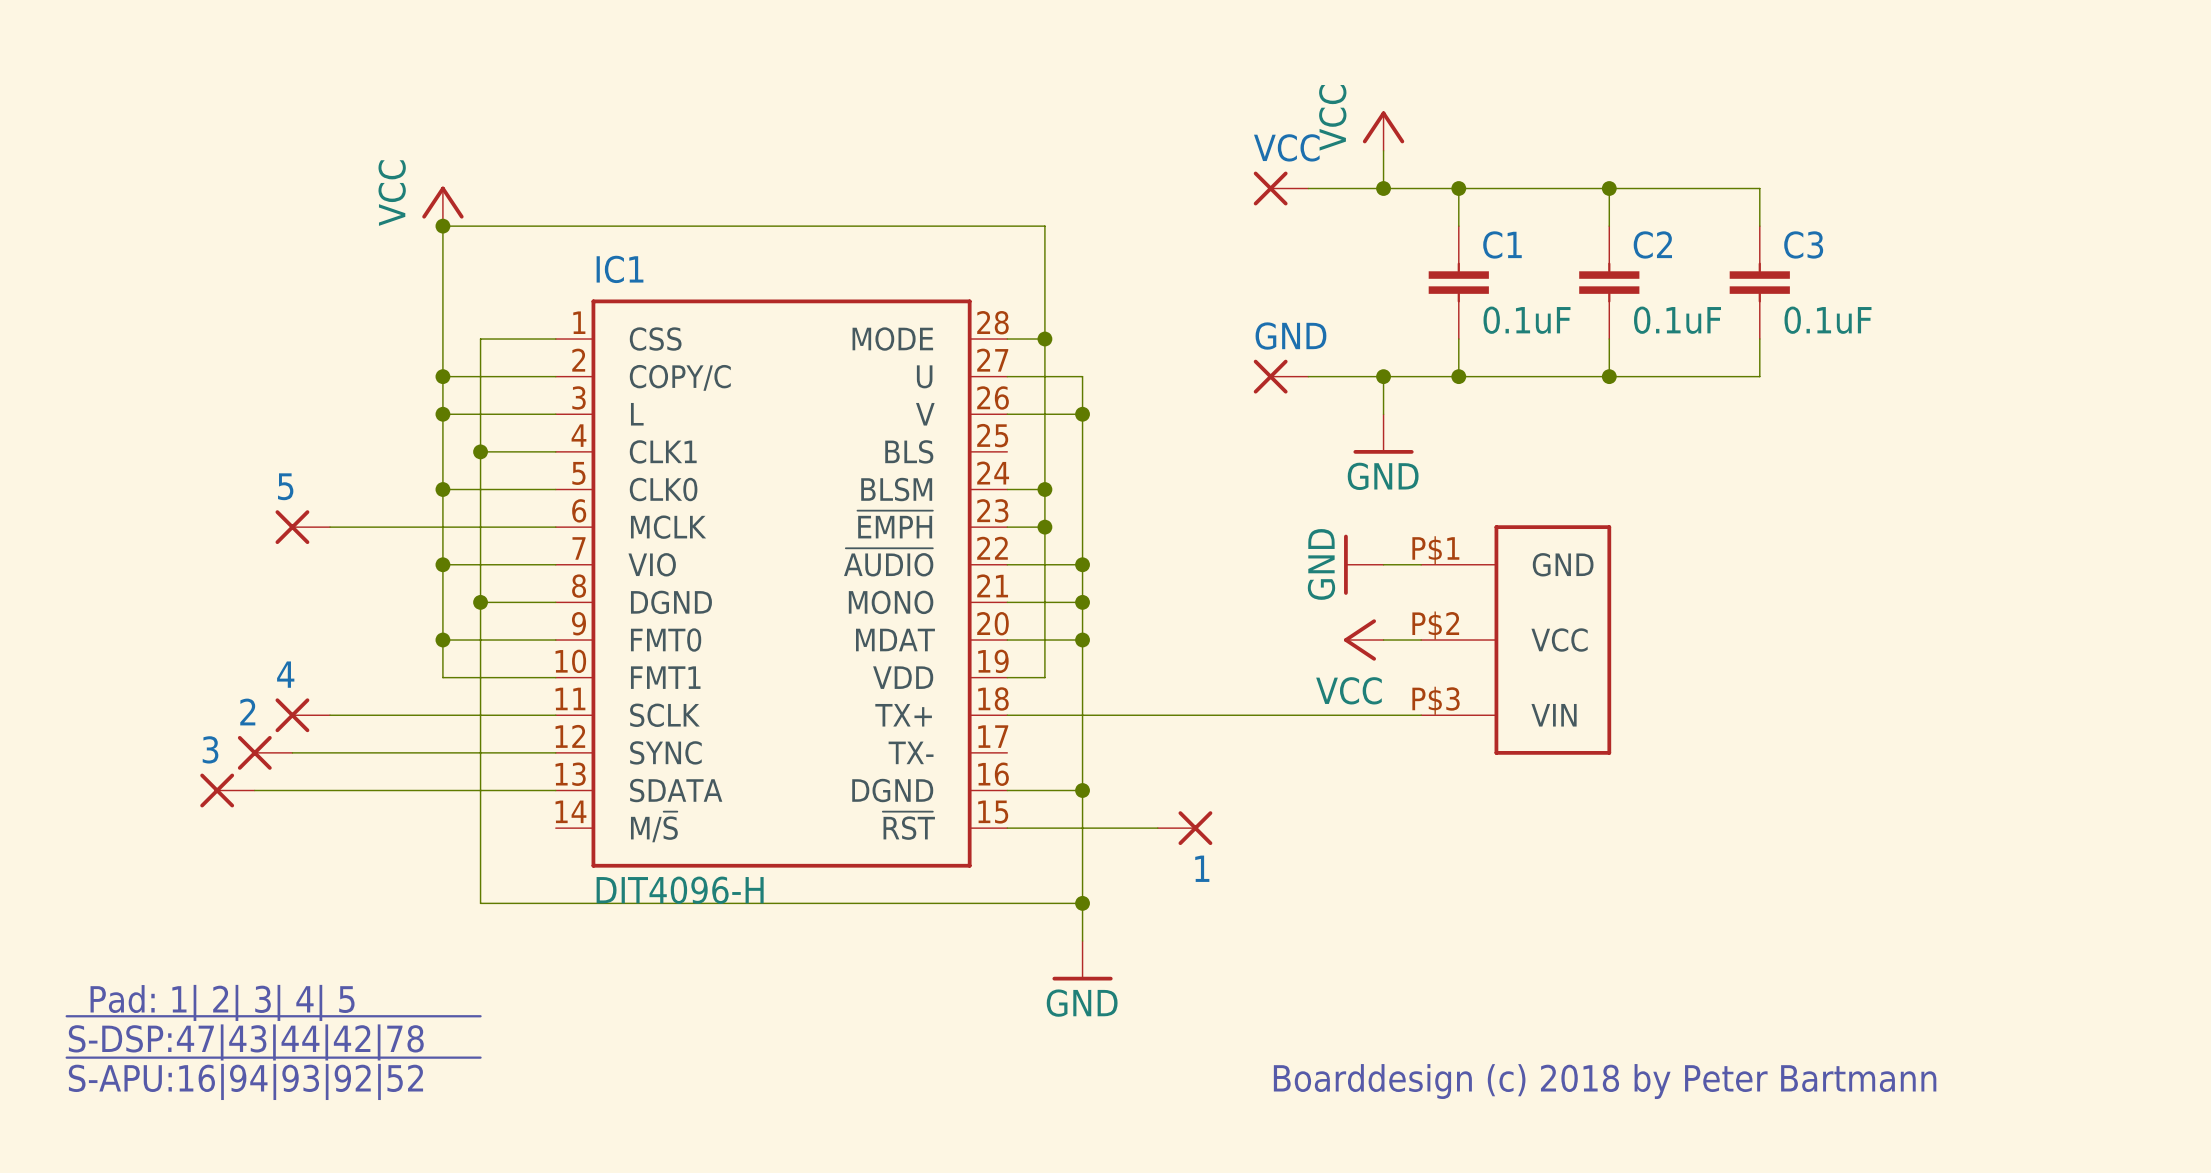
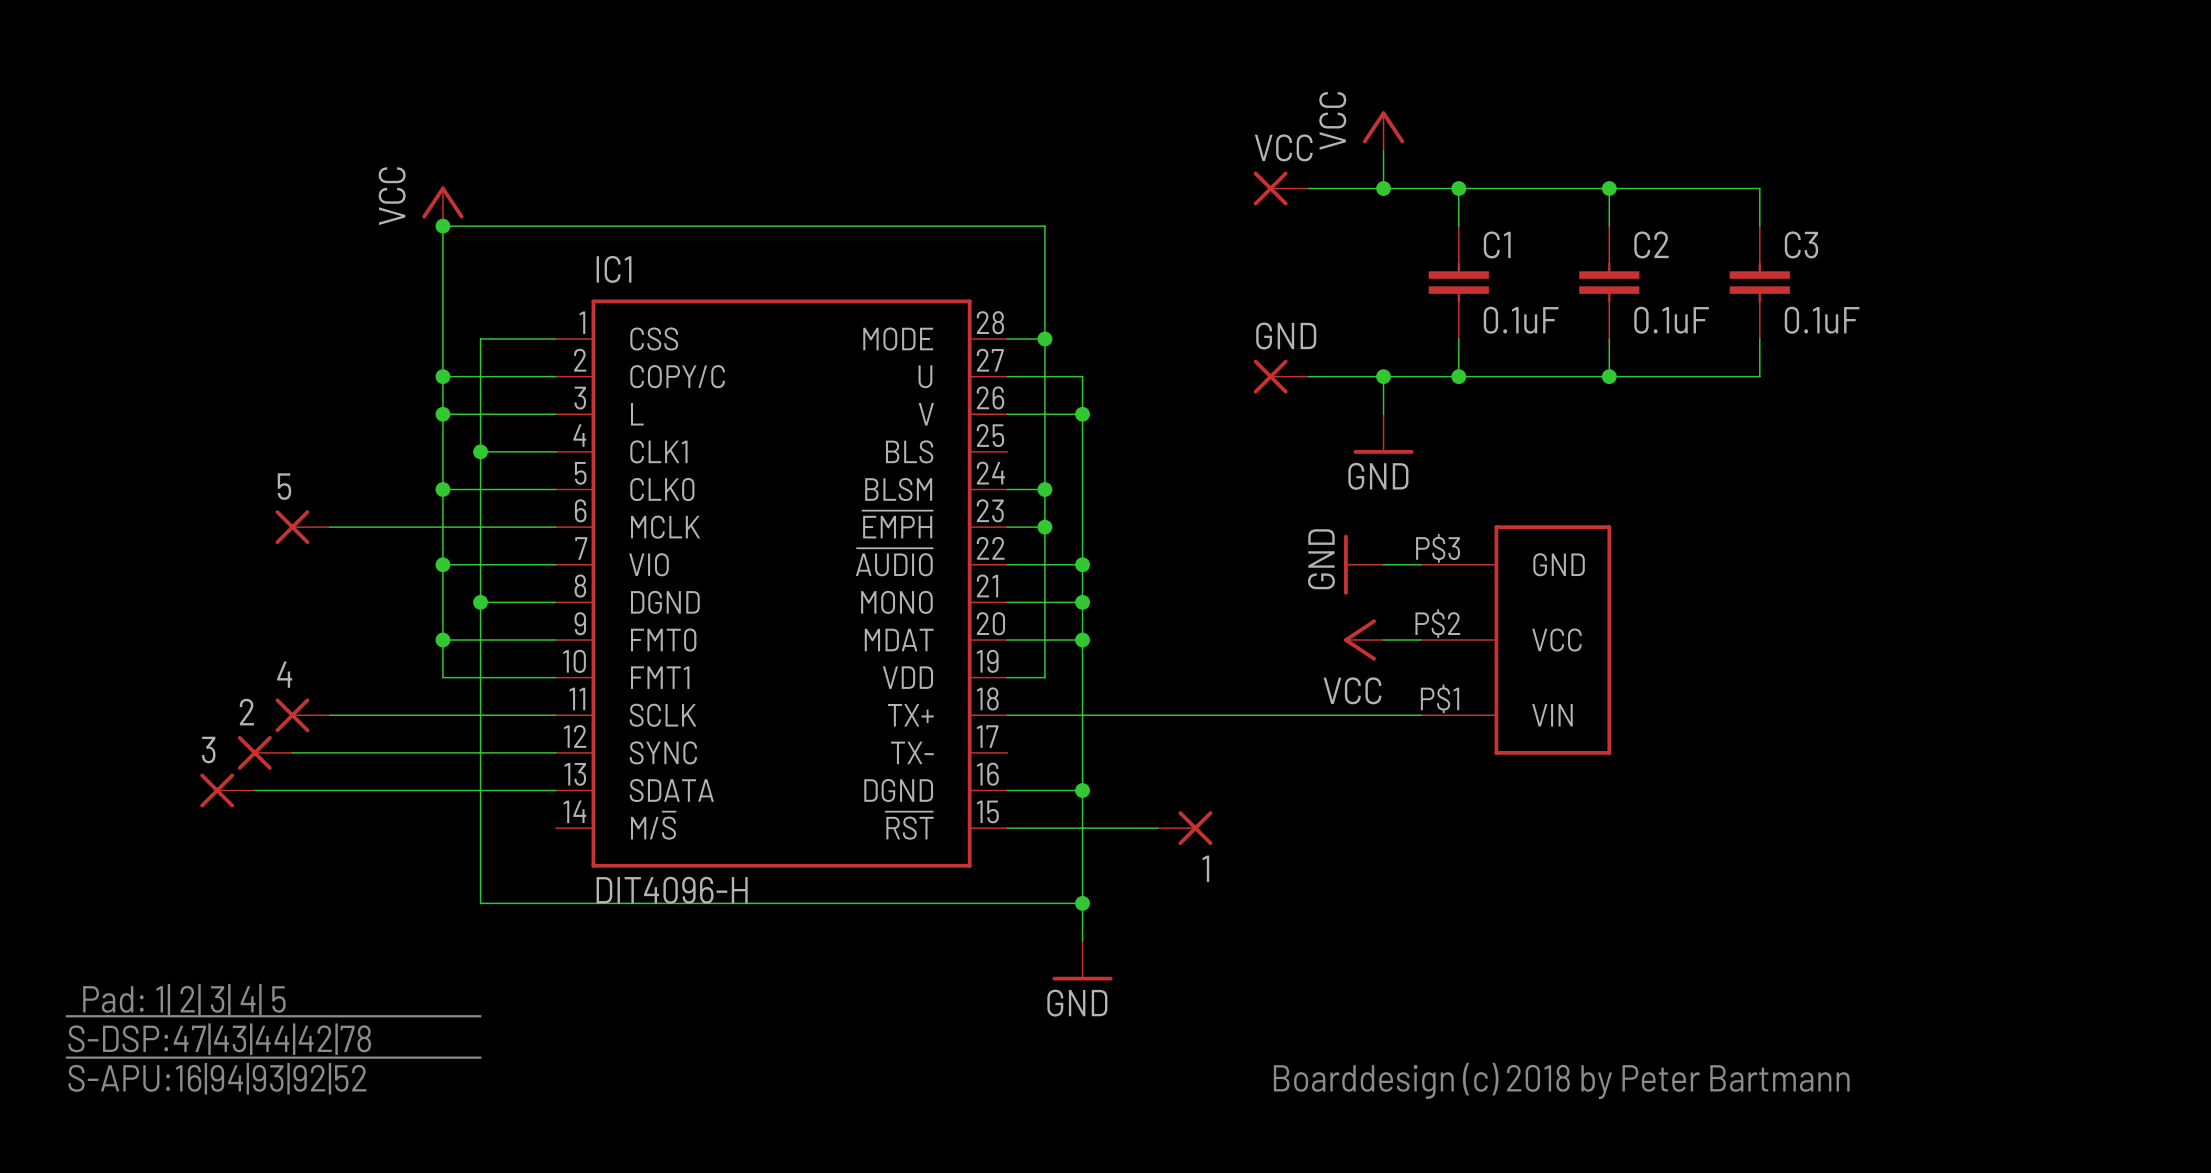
part pin number: P$1 (1435, 550) -> P$3 (1438, 548)
part pin number: P$3 (1436, 700) -> P$1 (1440, 698)

